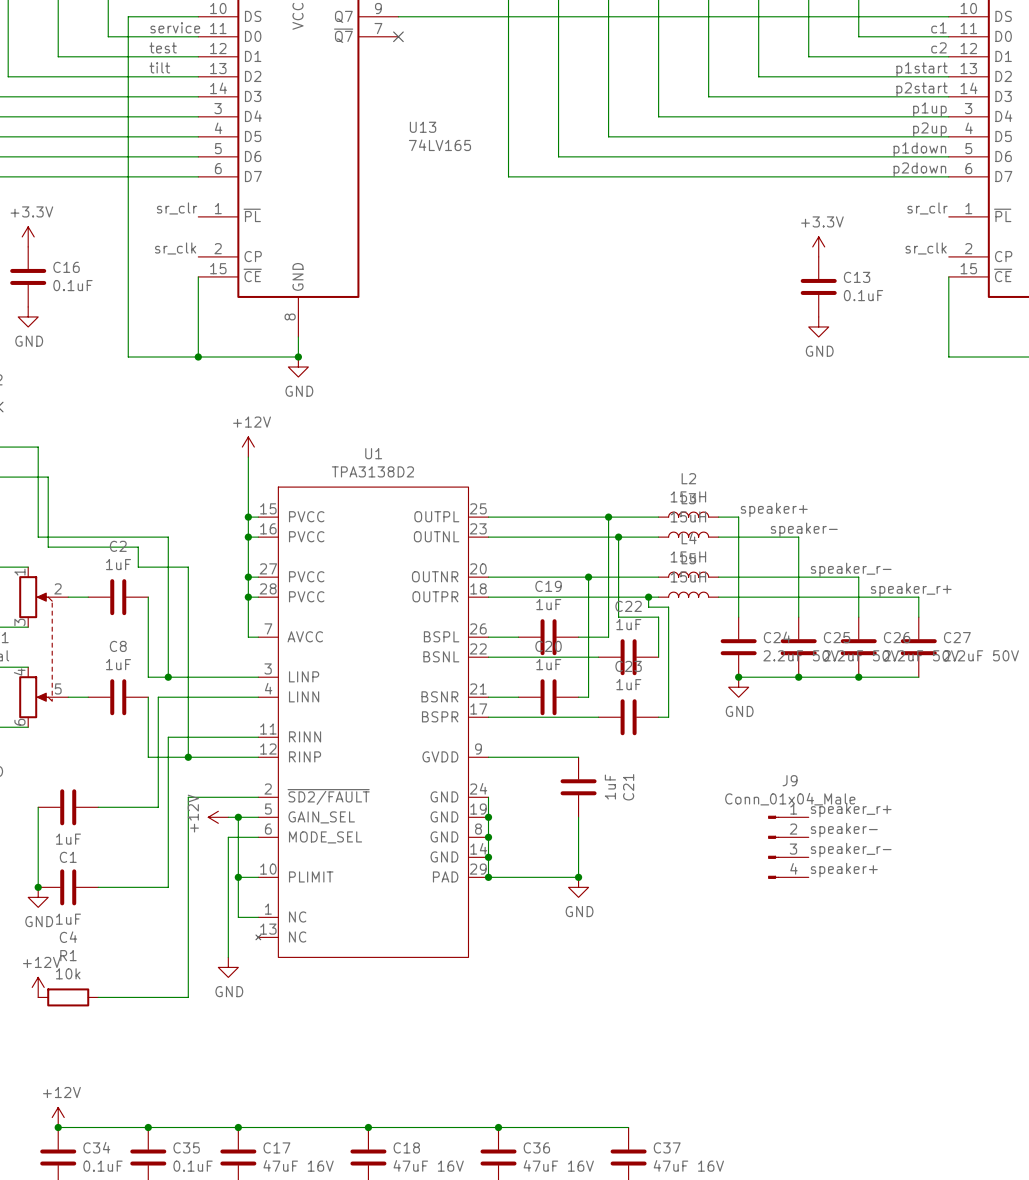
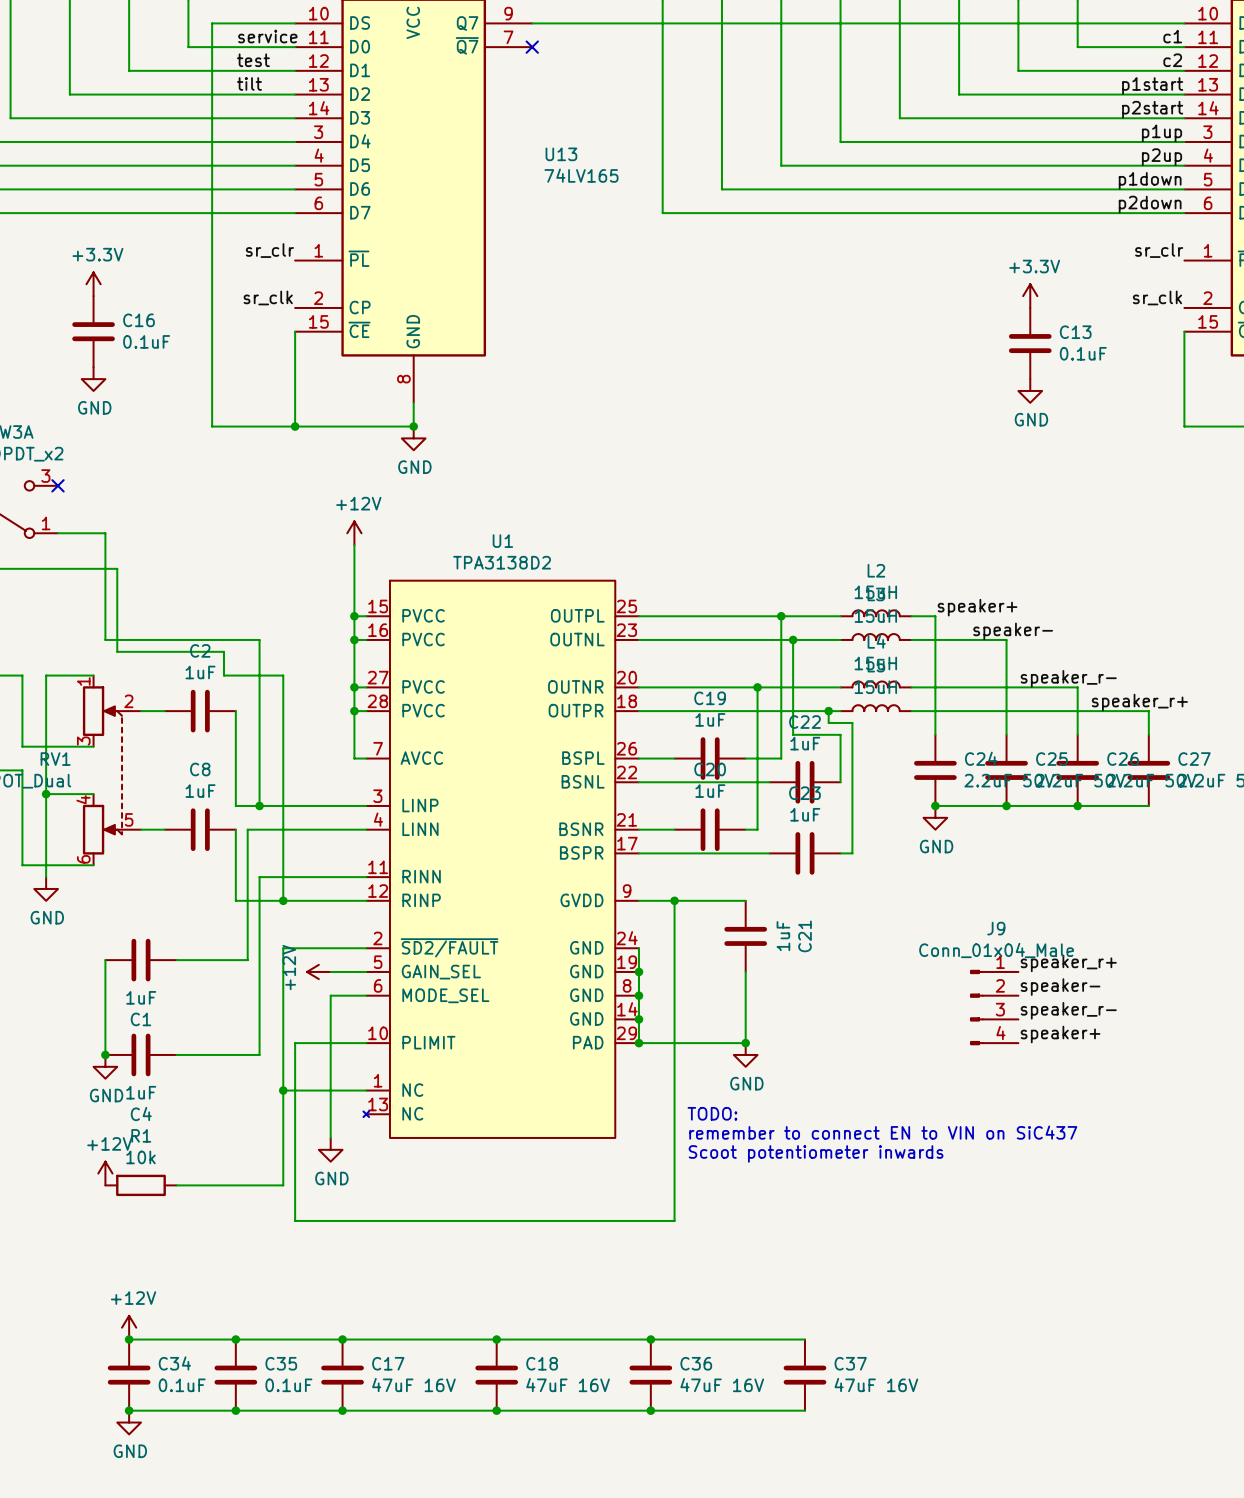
wire: none -> (674, 900) (674, 1220) (295, 1220) (295, 1043) (342, 1043)
junction: none -> (674, 900)
wire: (238, 817) (238, 917) -> (283, 1090) (342, 1090)
junction: (238, 817) -> none
junction: (238, 877) -> none
junction: none -> (283, 1090)
text: none -> TODO: (712, 1113)
text: none -> remember to connect EN to VIN on SiC437 (883, 1132)
text: none -> Scoot potentiometer inwards (816, 1153)

